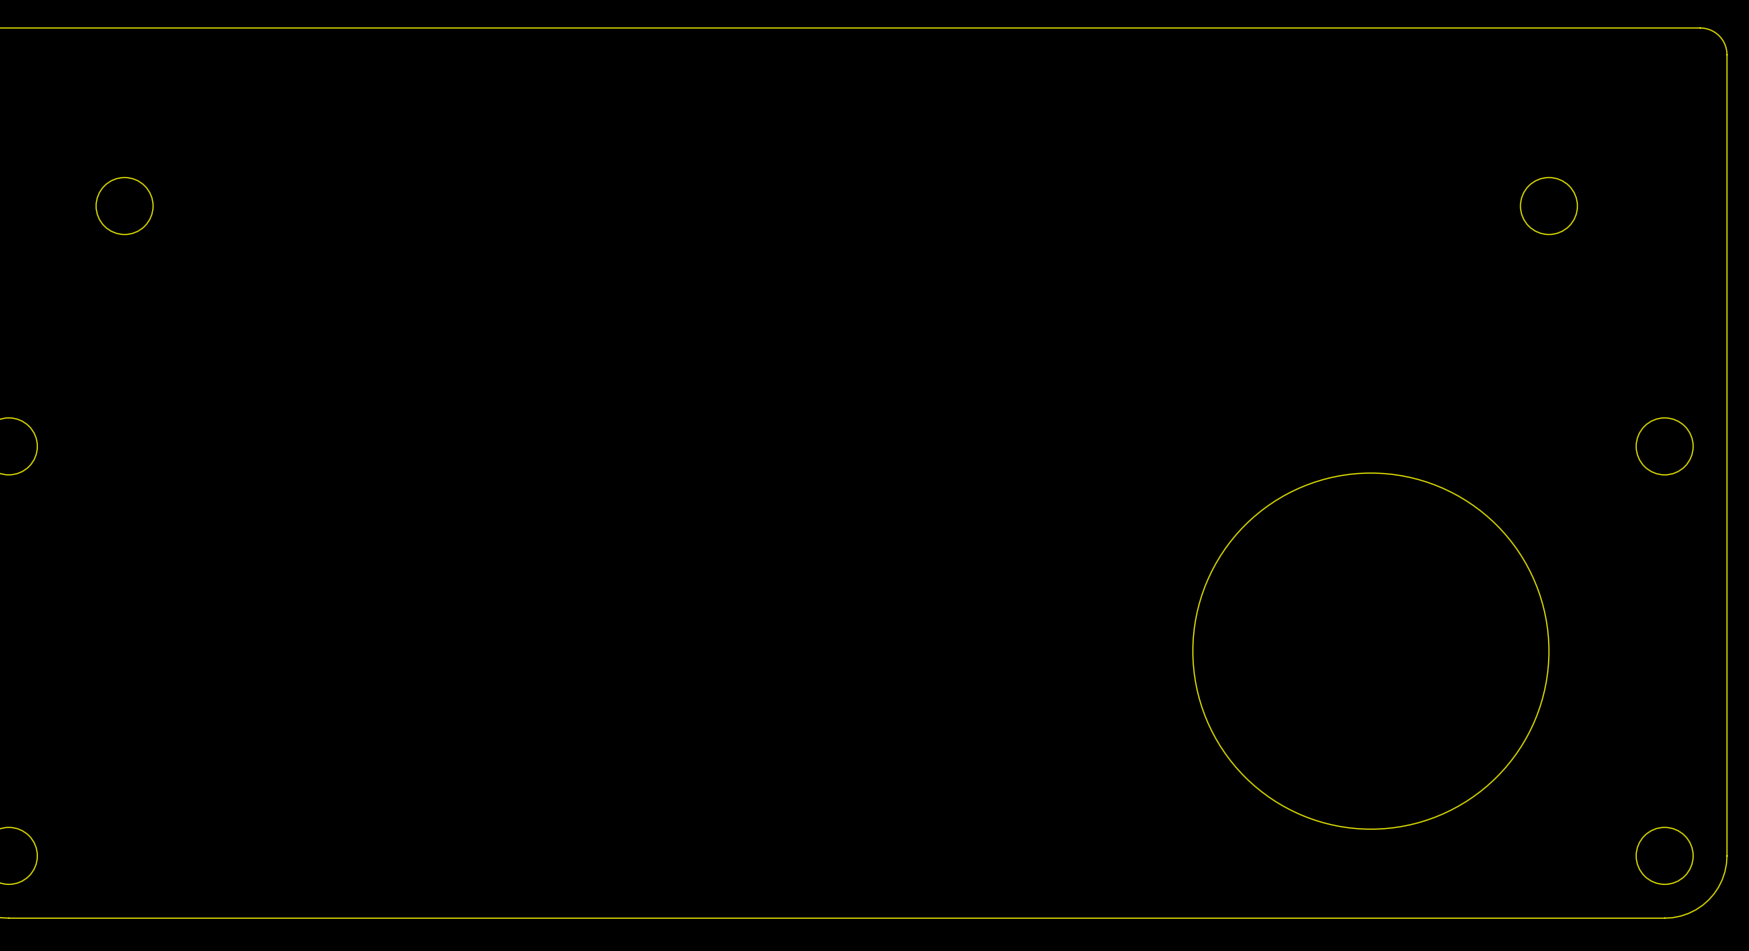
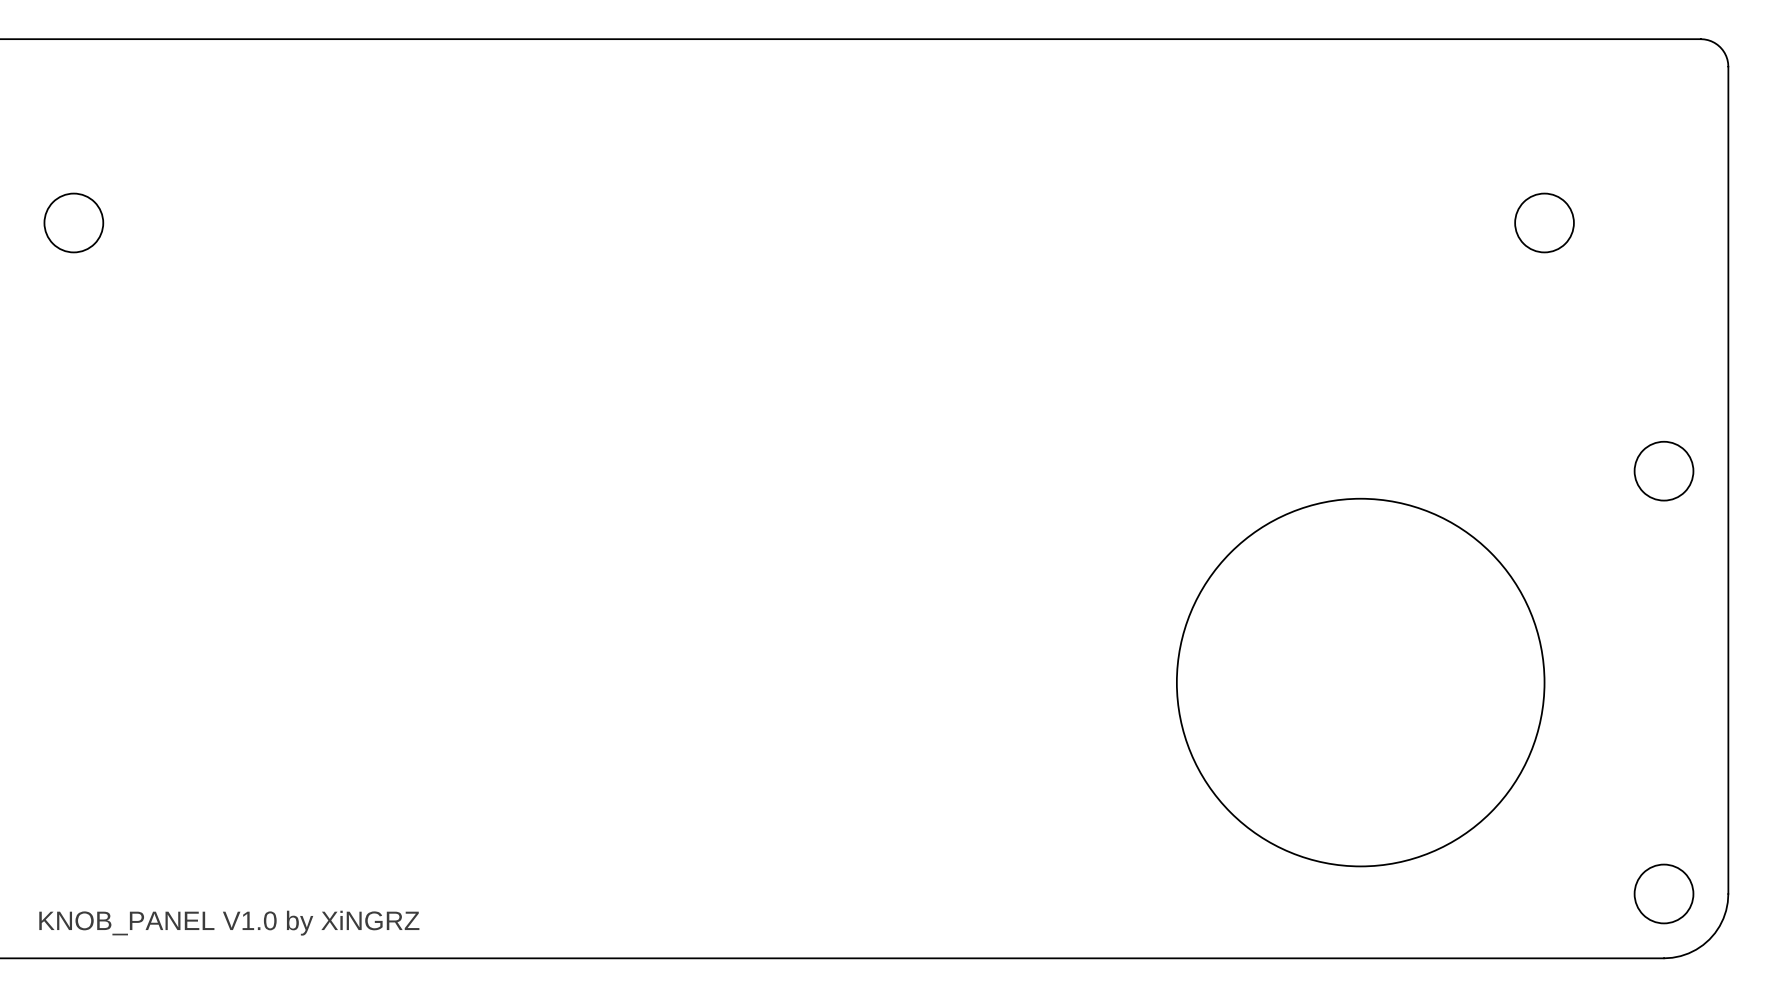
text: none -> KNOB_PANEL V1.0 by XiNGRZ (229, 923)

